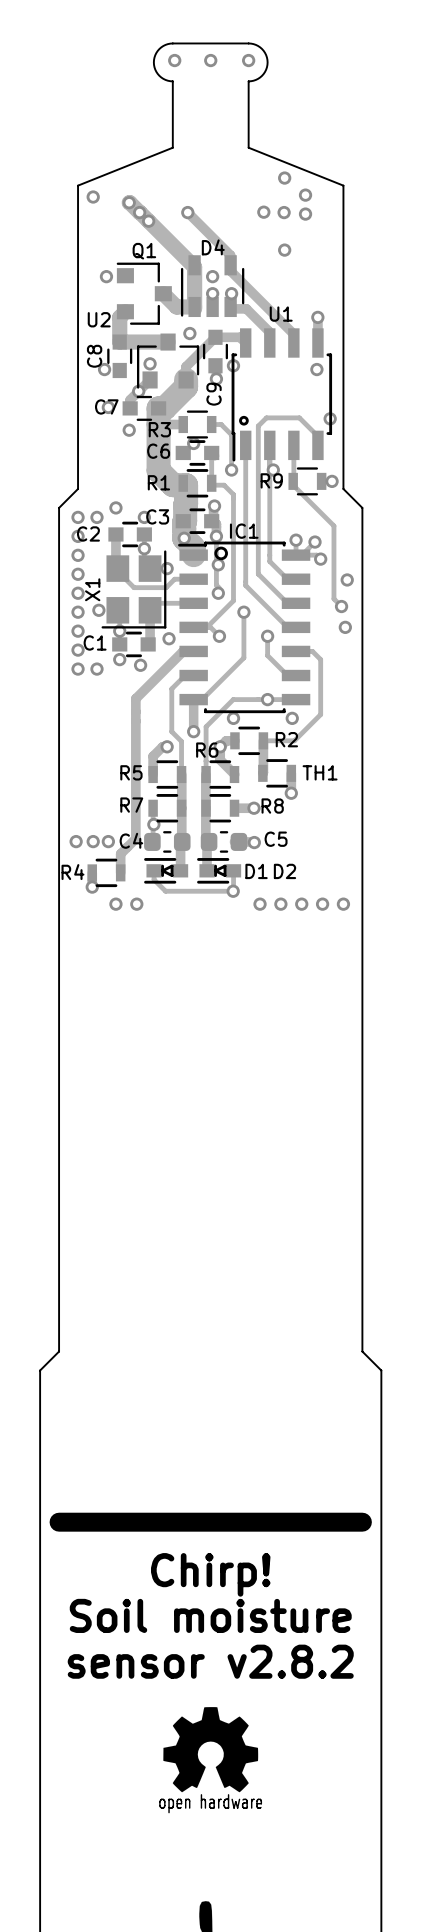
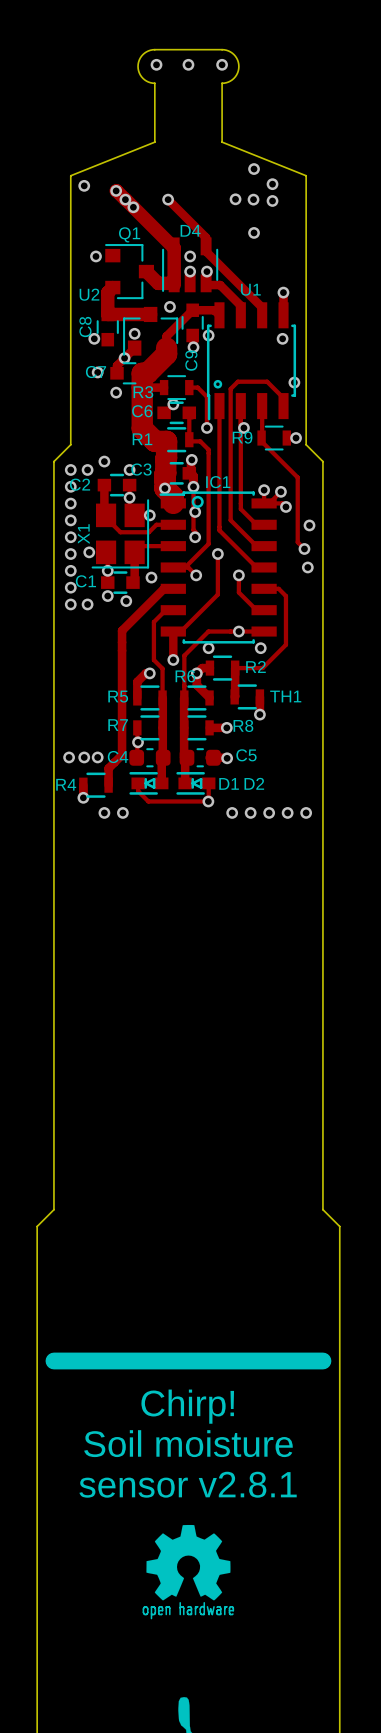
text: sensor v2.8.2 (210, 1661) -> sensor v2.8.1 (188, 1484)

